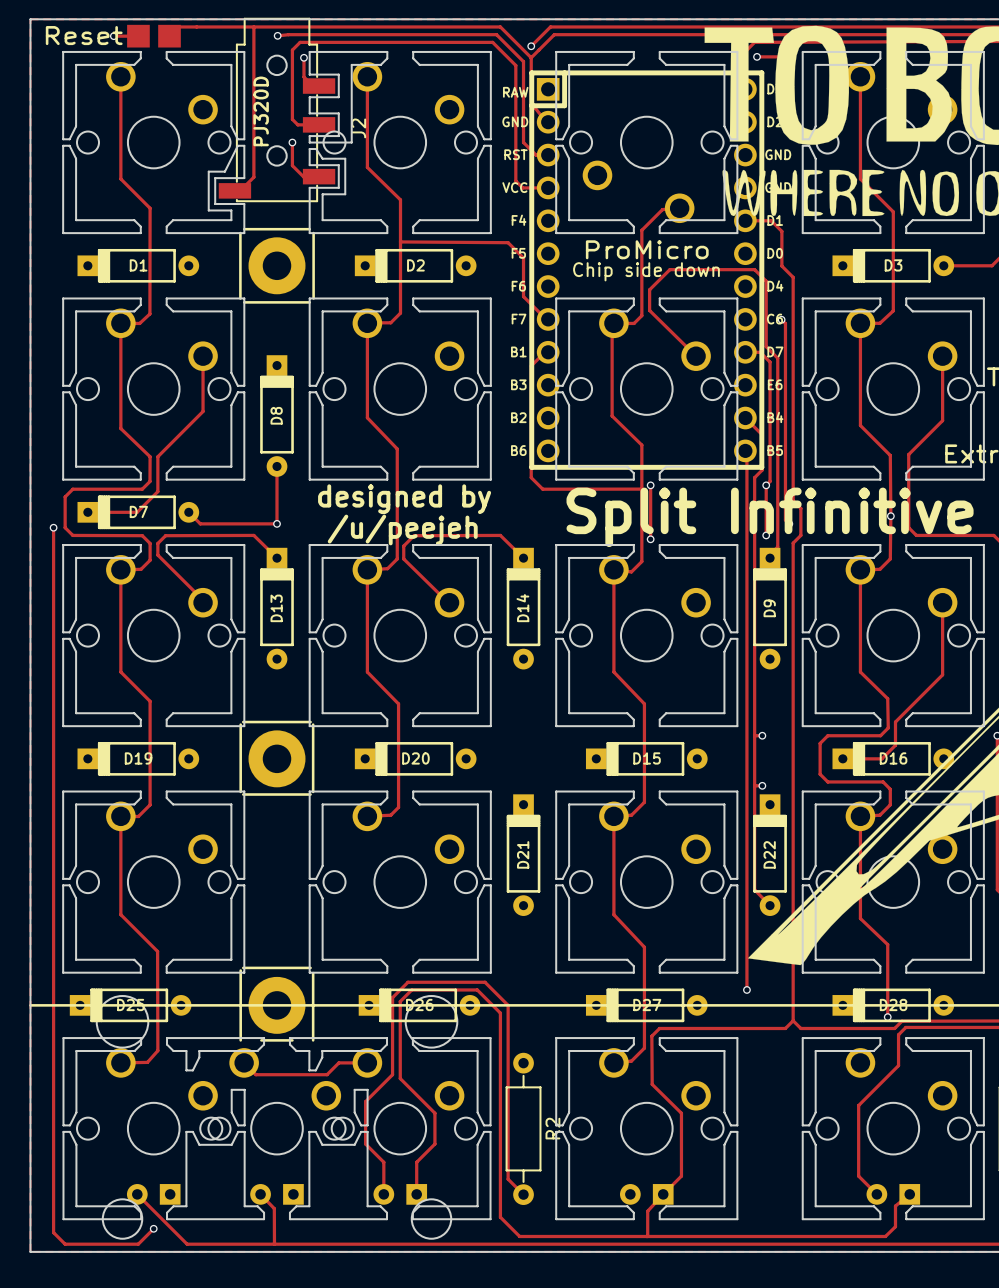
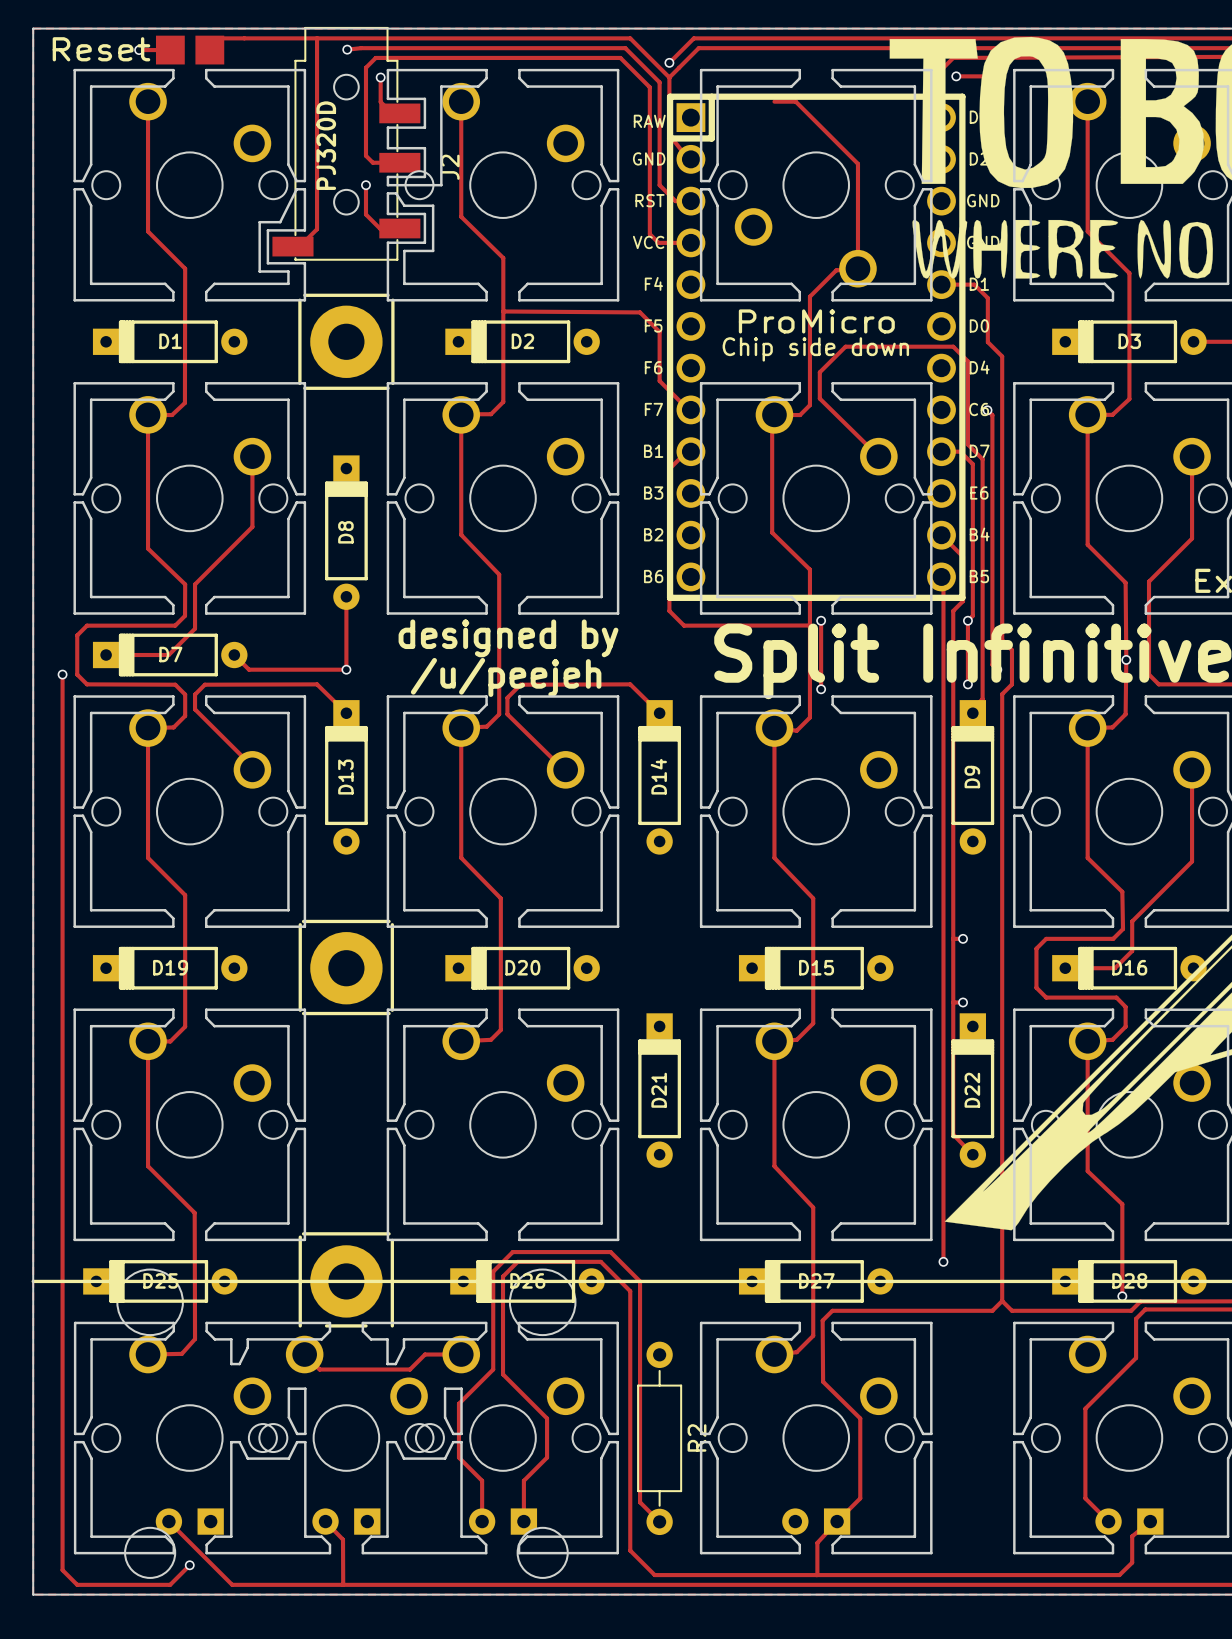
track: none -> (774, 101) (795, 101) (857, 163) (857, 268)

